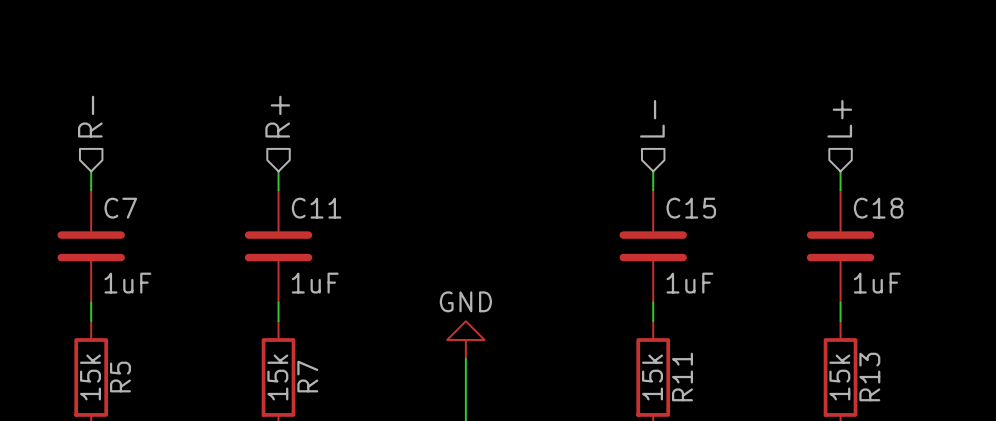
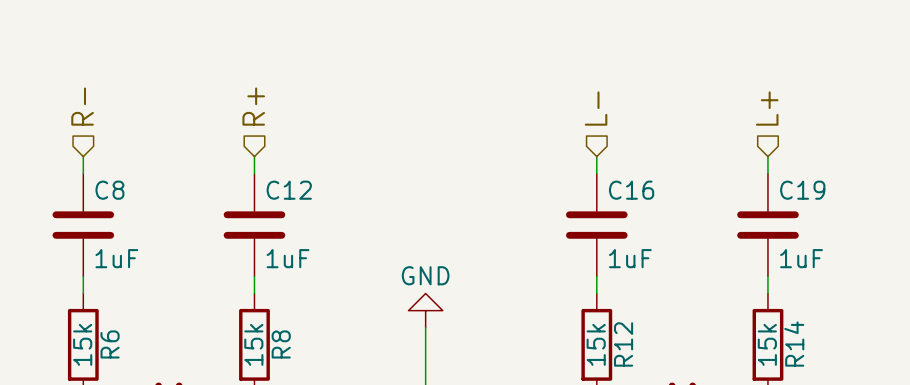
C7 name: C7 (120, 208) -> C8 (109, 190)
C11 name: C11 (316, 208) -> C12 (289, 190)
C15 name: C15 (691, 208) -> C16 (631, 190)
C18 name: C18 (878, 208) -> C19 (802, 190)
R7 name: R7 (307, 376) -> R8 (281, 344)
R5 name: R5 (120, 377) -> R6 (110, 344)
R11 name: R11 (682, 377) -> R12 (623, 344)
R13 name: R13 (869, 377) -> R14 (794, 344)

